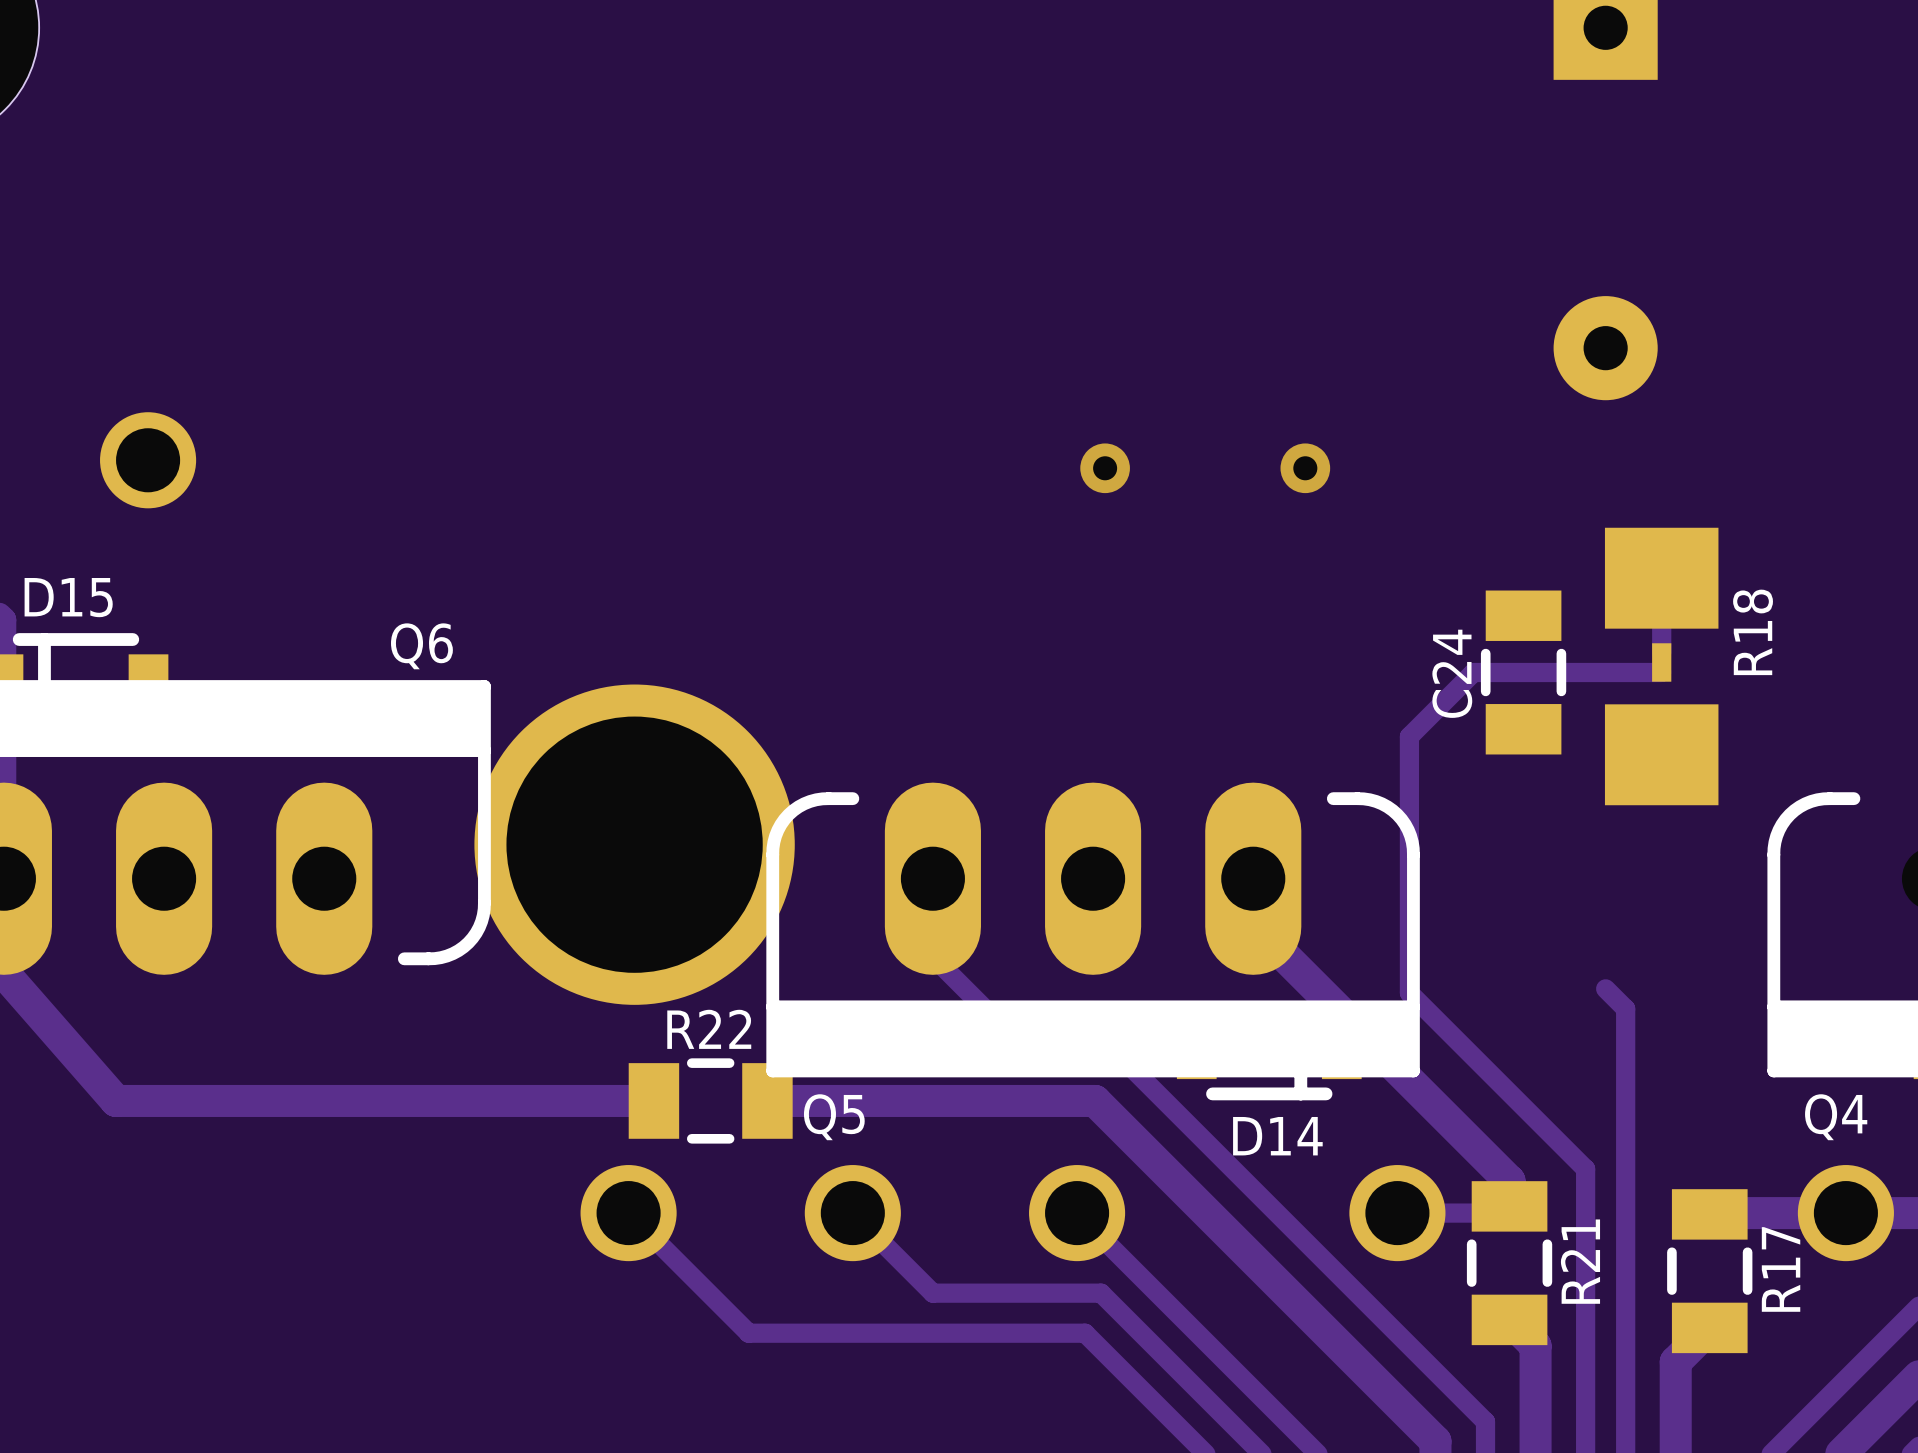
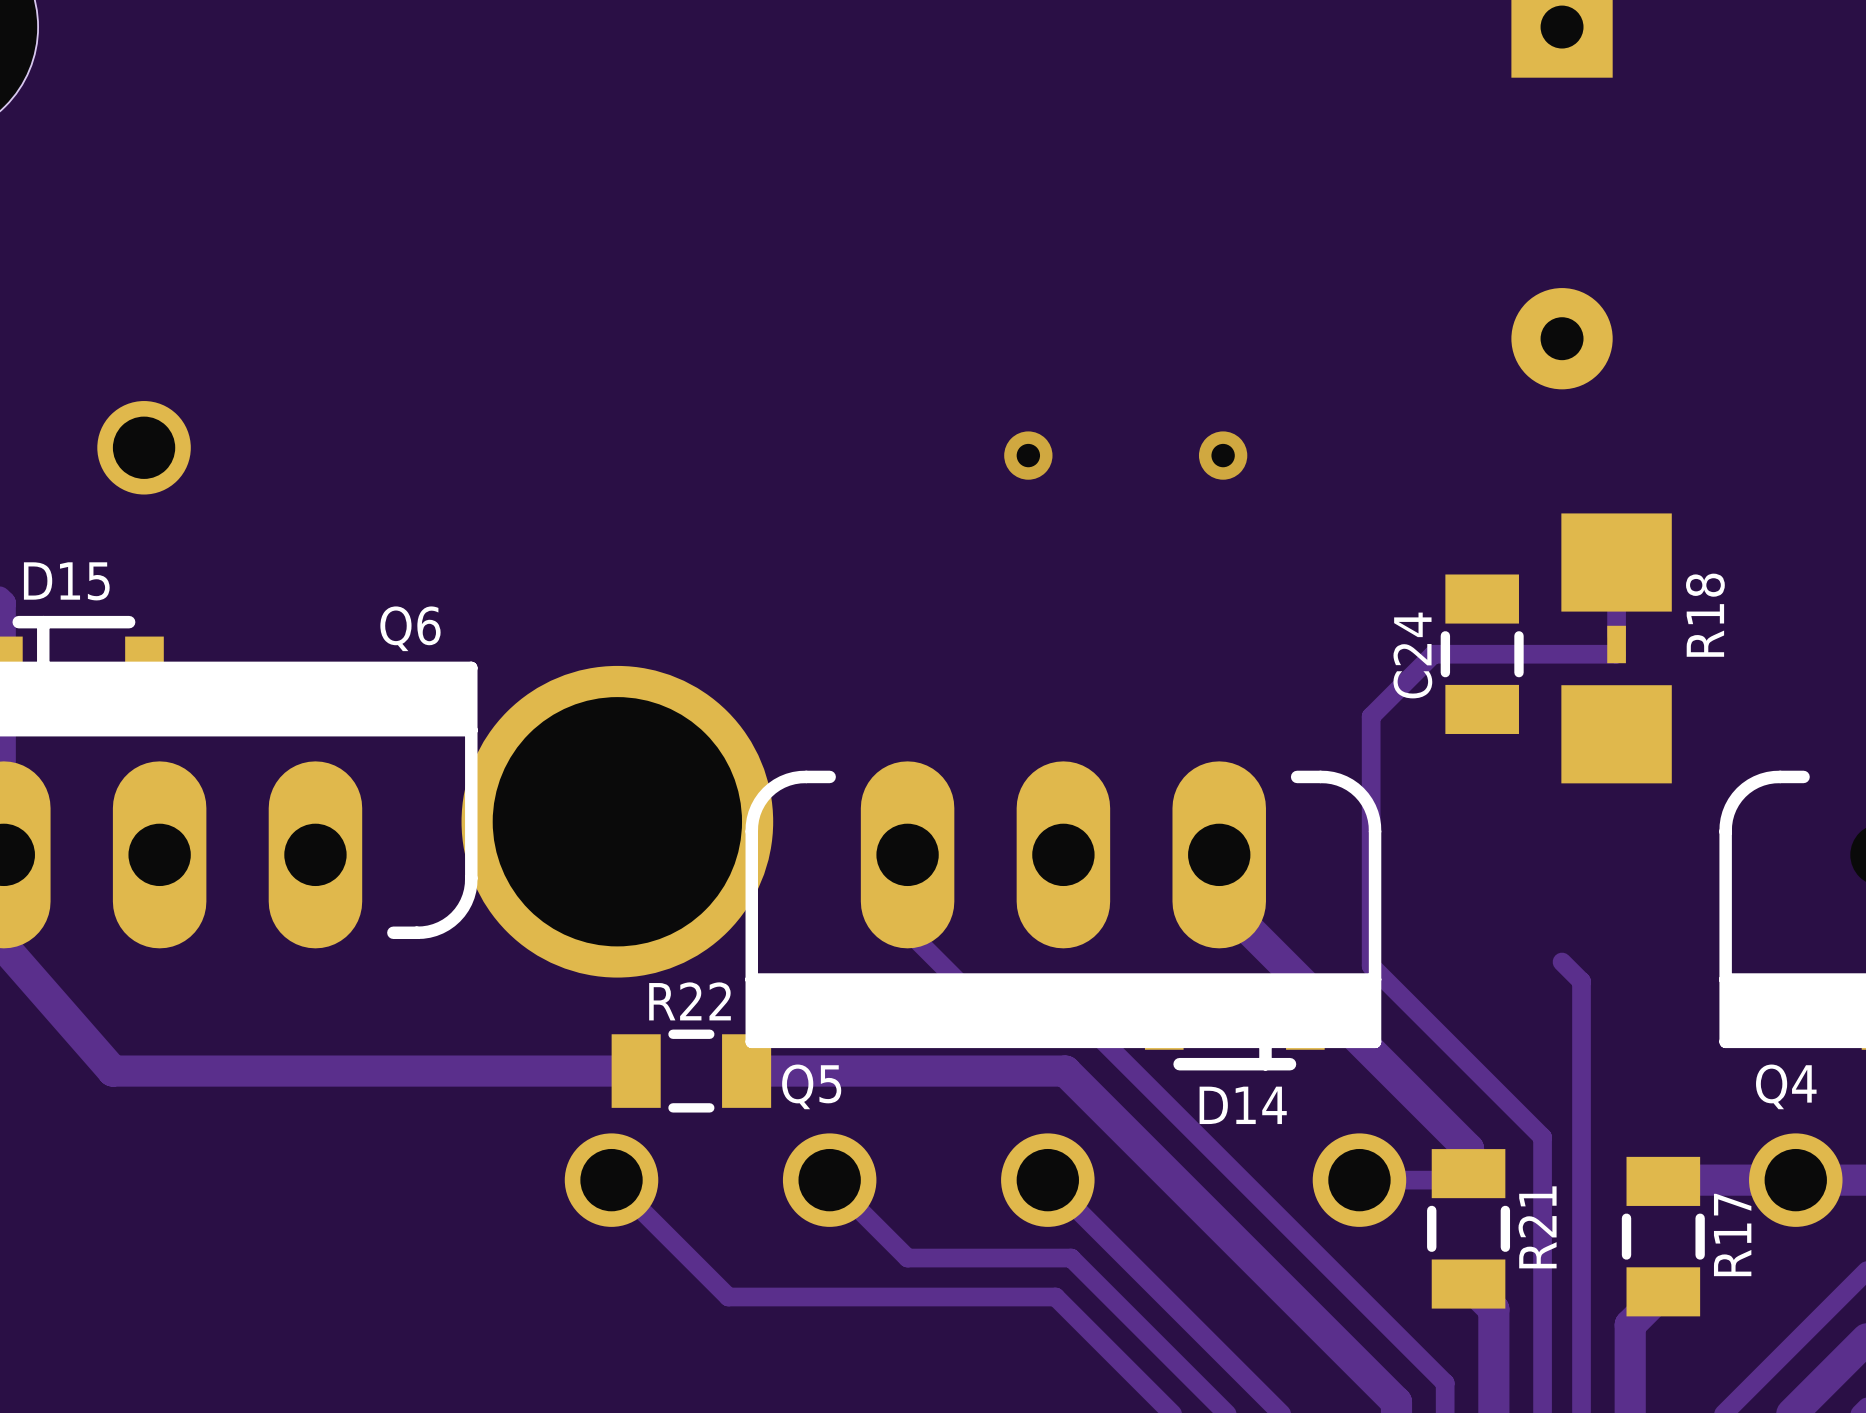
via position: (1105, 468) -> (1028, 455)
via position: (1305, 468) -> (1223, 455)

